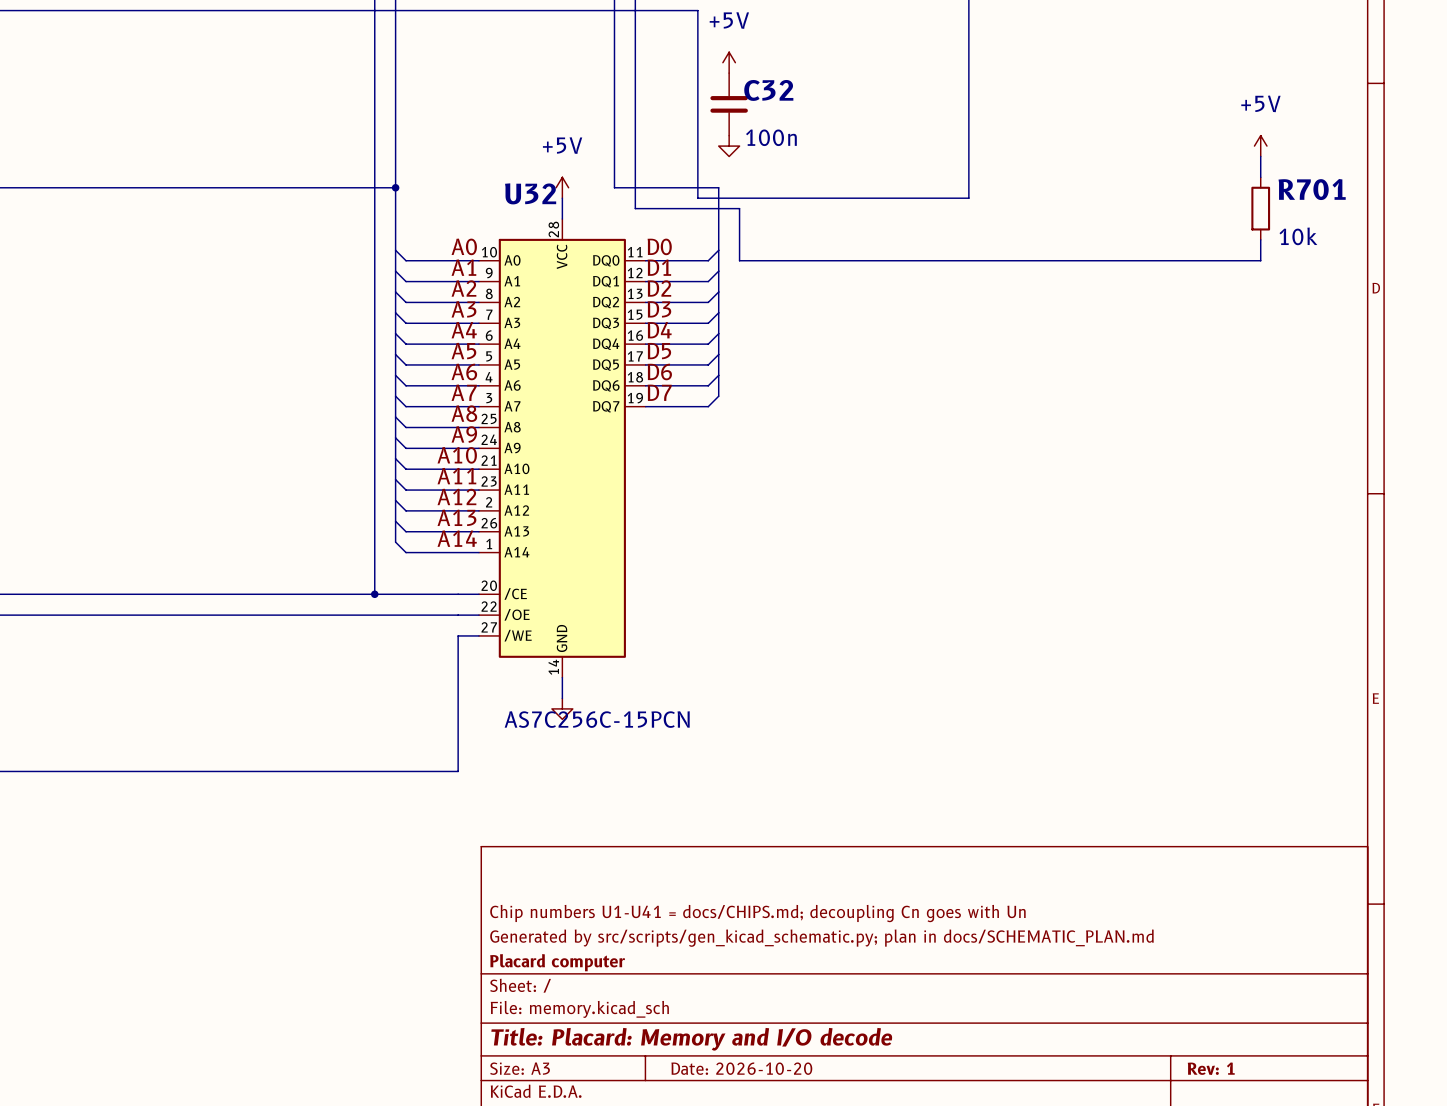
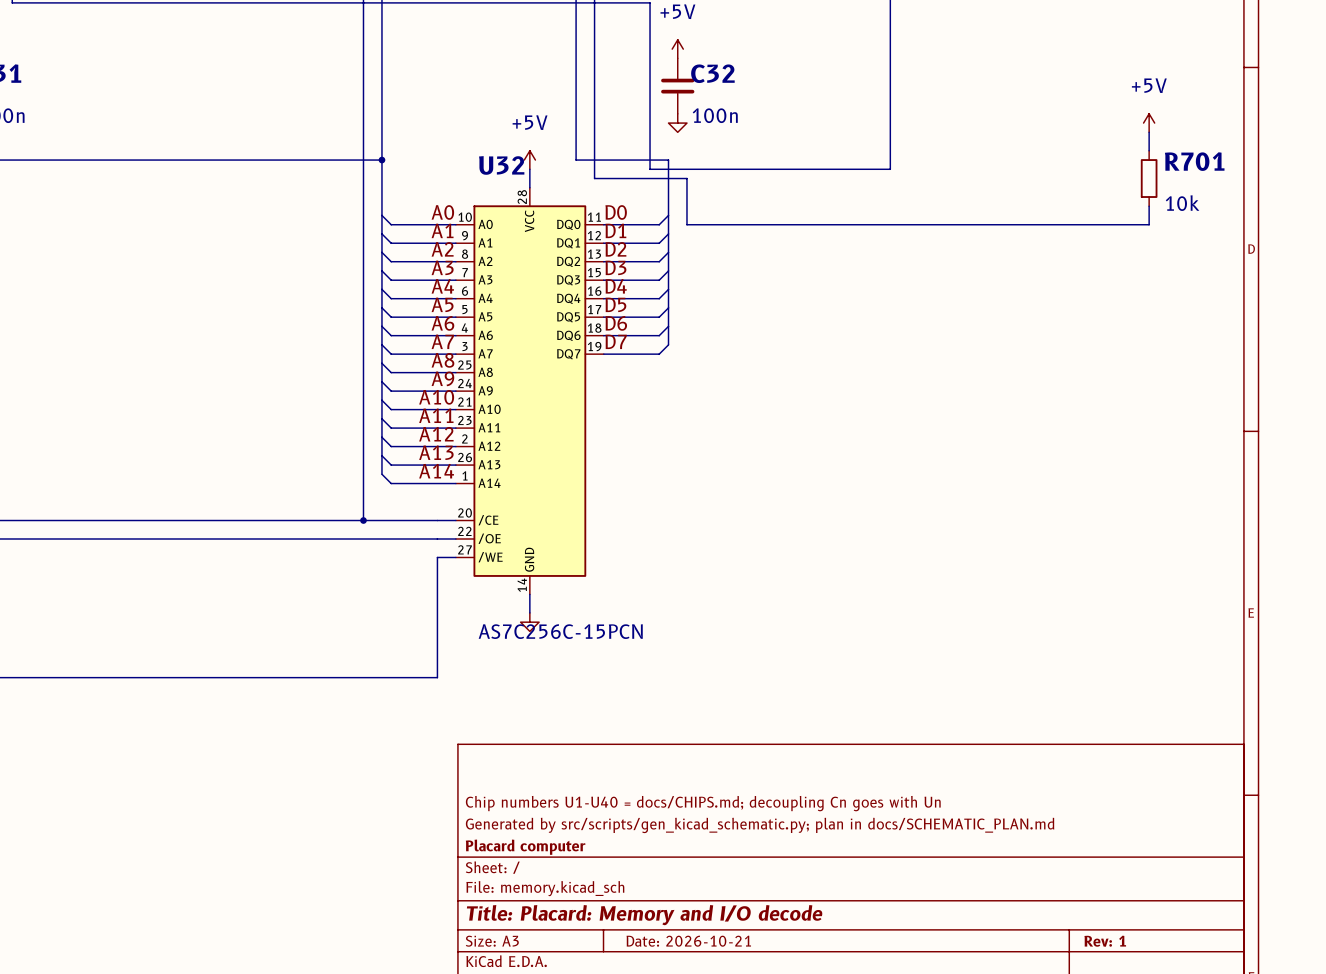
title block: Chip numbers U1-U41 = docs/CHIPS.md; decoupling Cn goes with Un (757, 913) -> Chip numbers U1-U40 = docs/CHIPS.md; decoupling Cn goes with Un (703, 803)
title block: Date: 2026-10-20 (741, 1068) -> Date: 2026-10-21 (688, 941)

